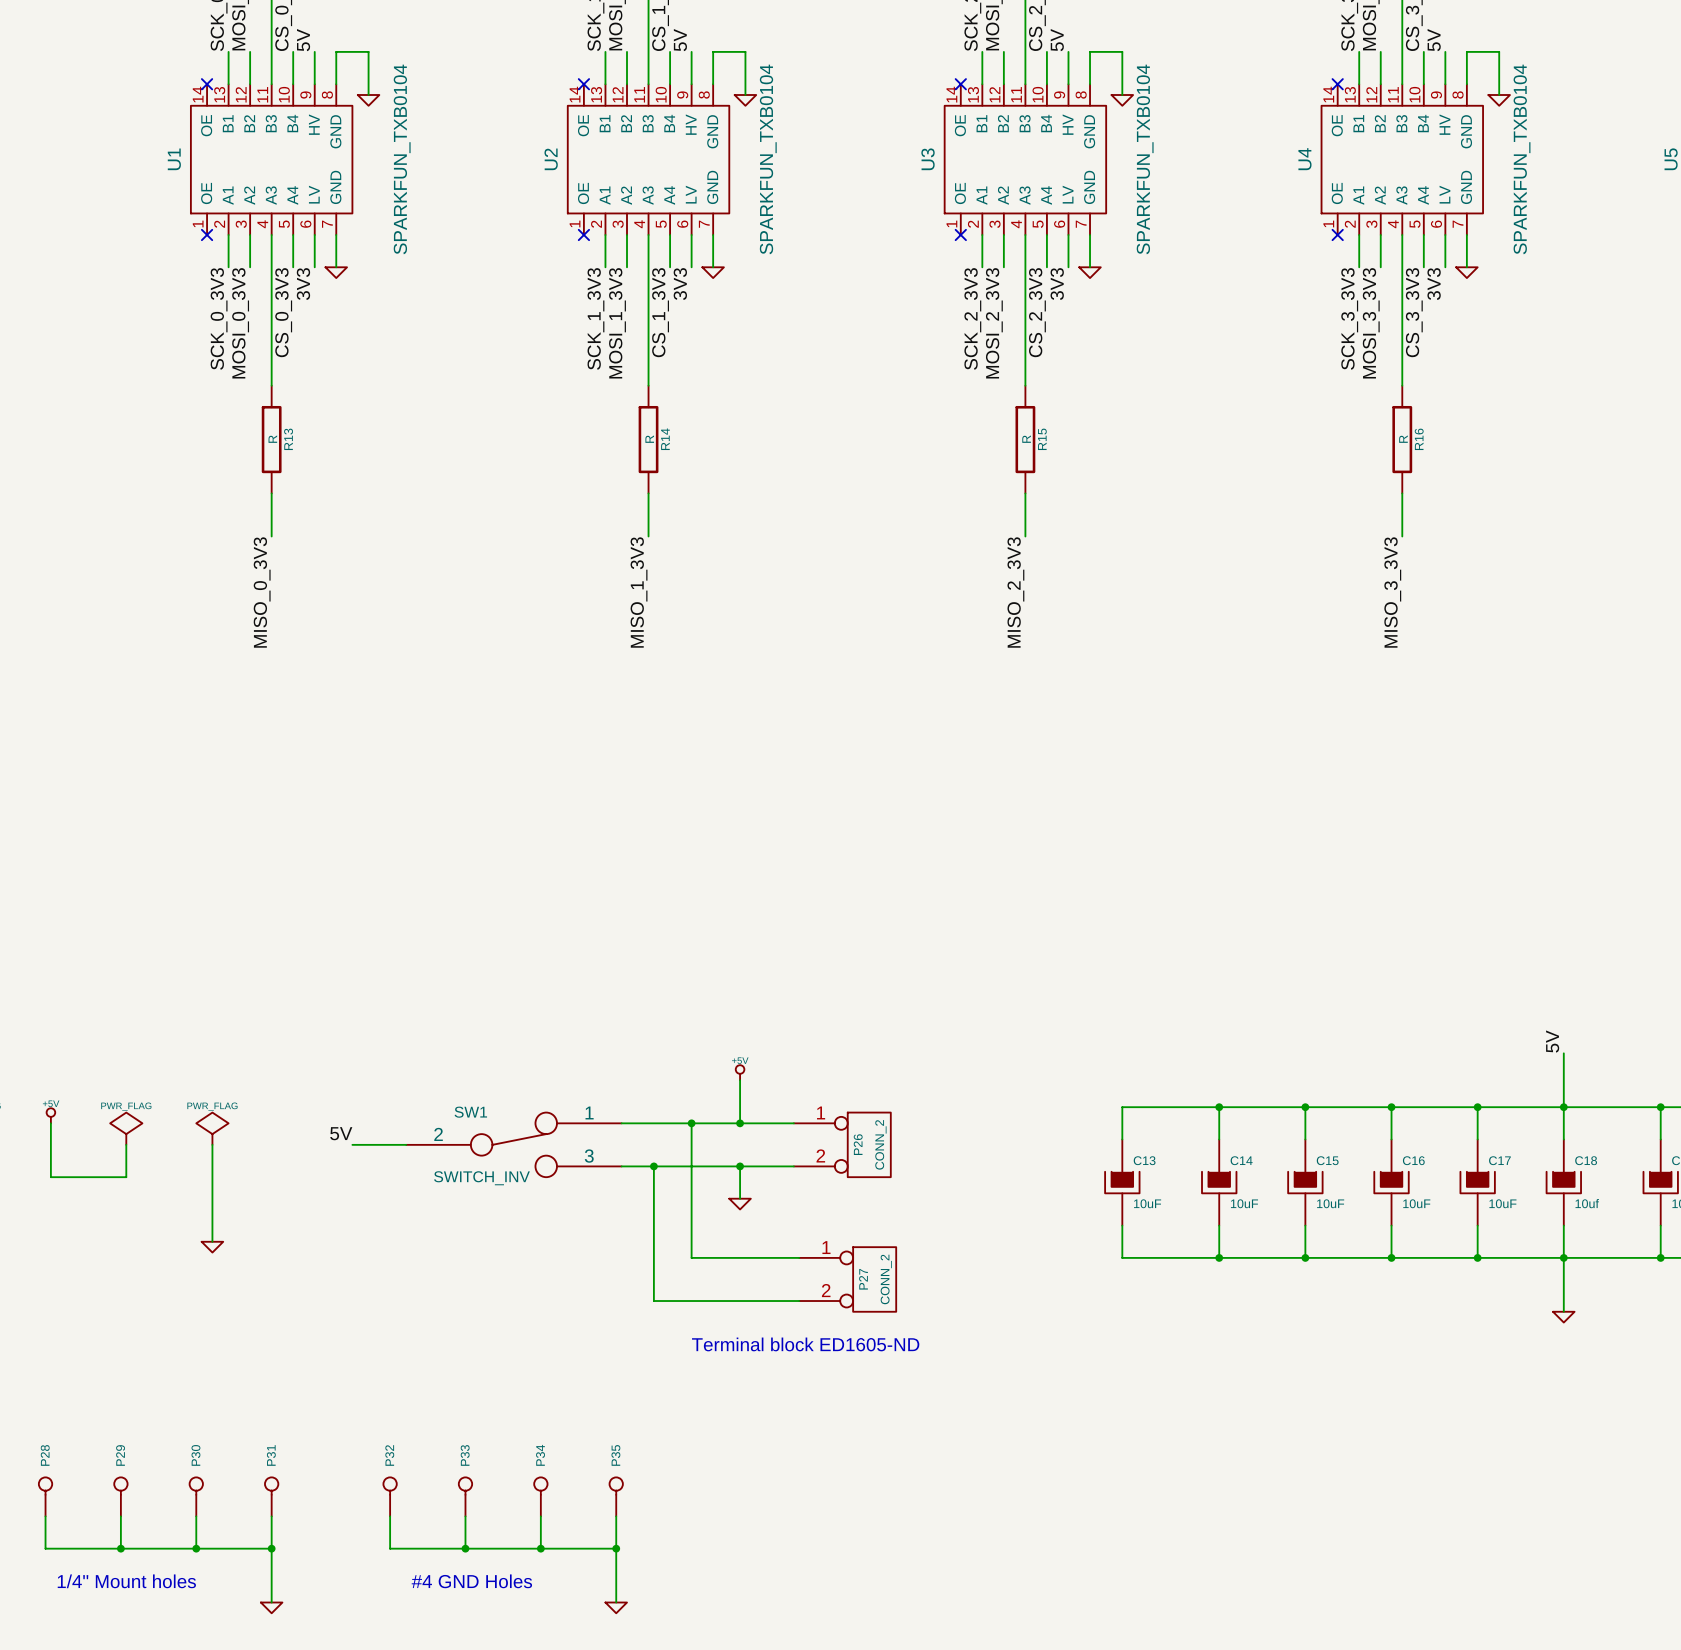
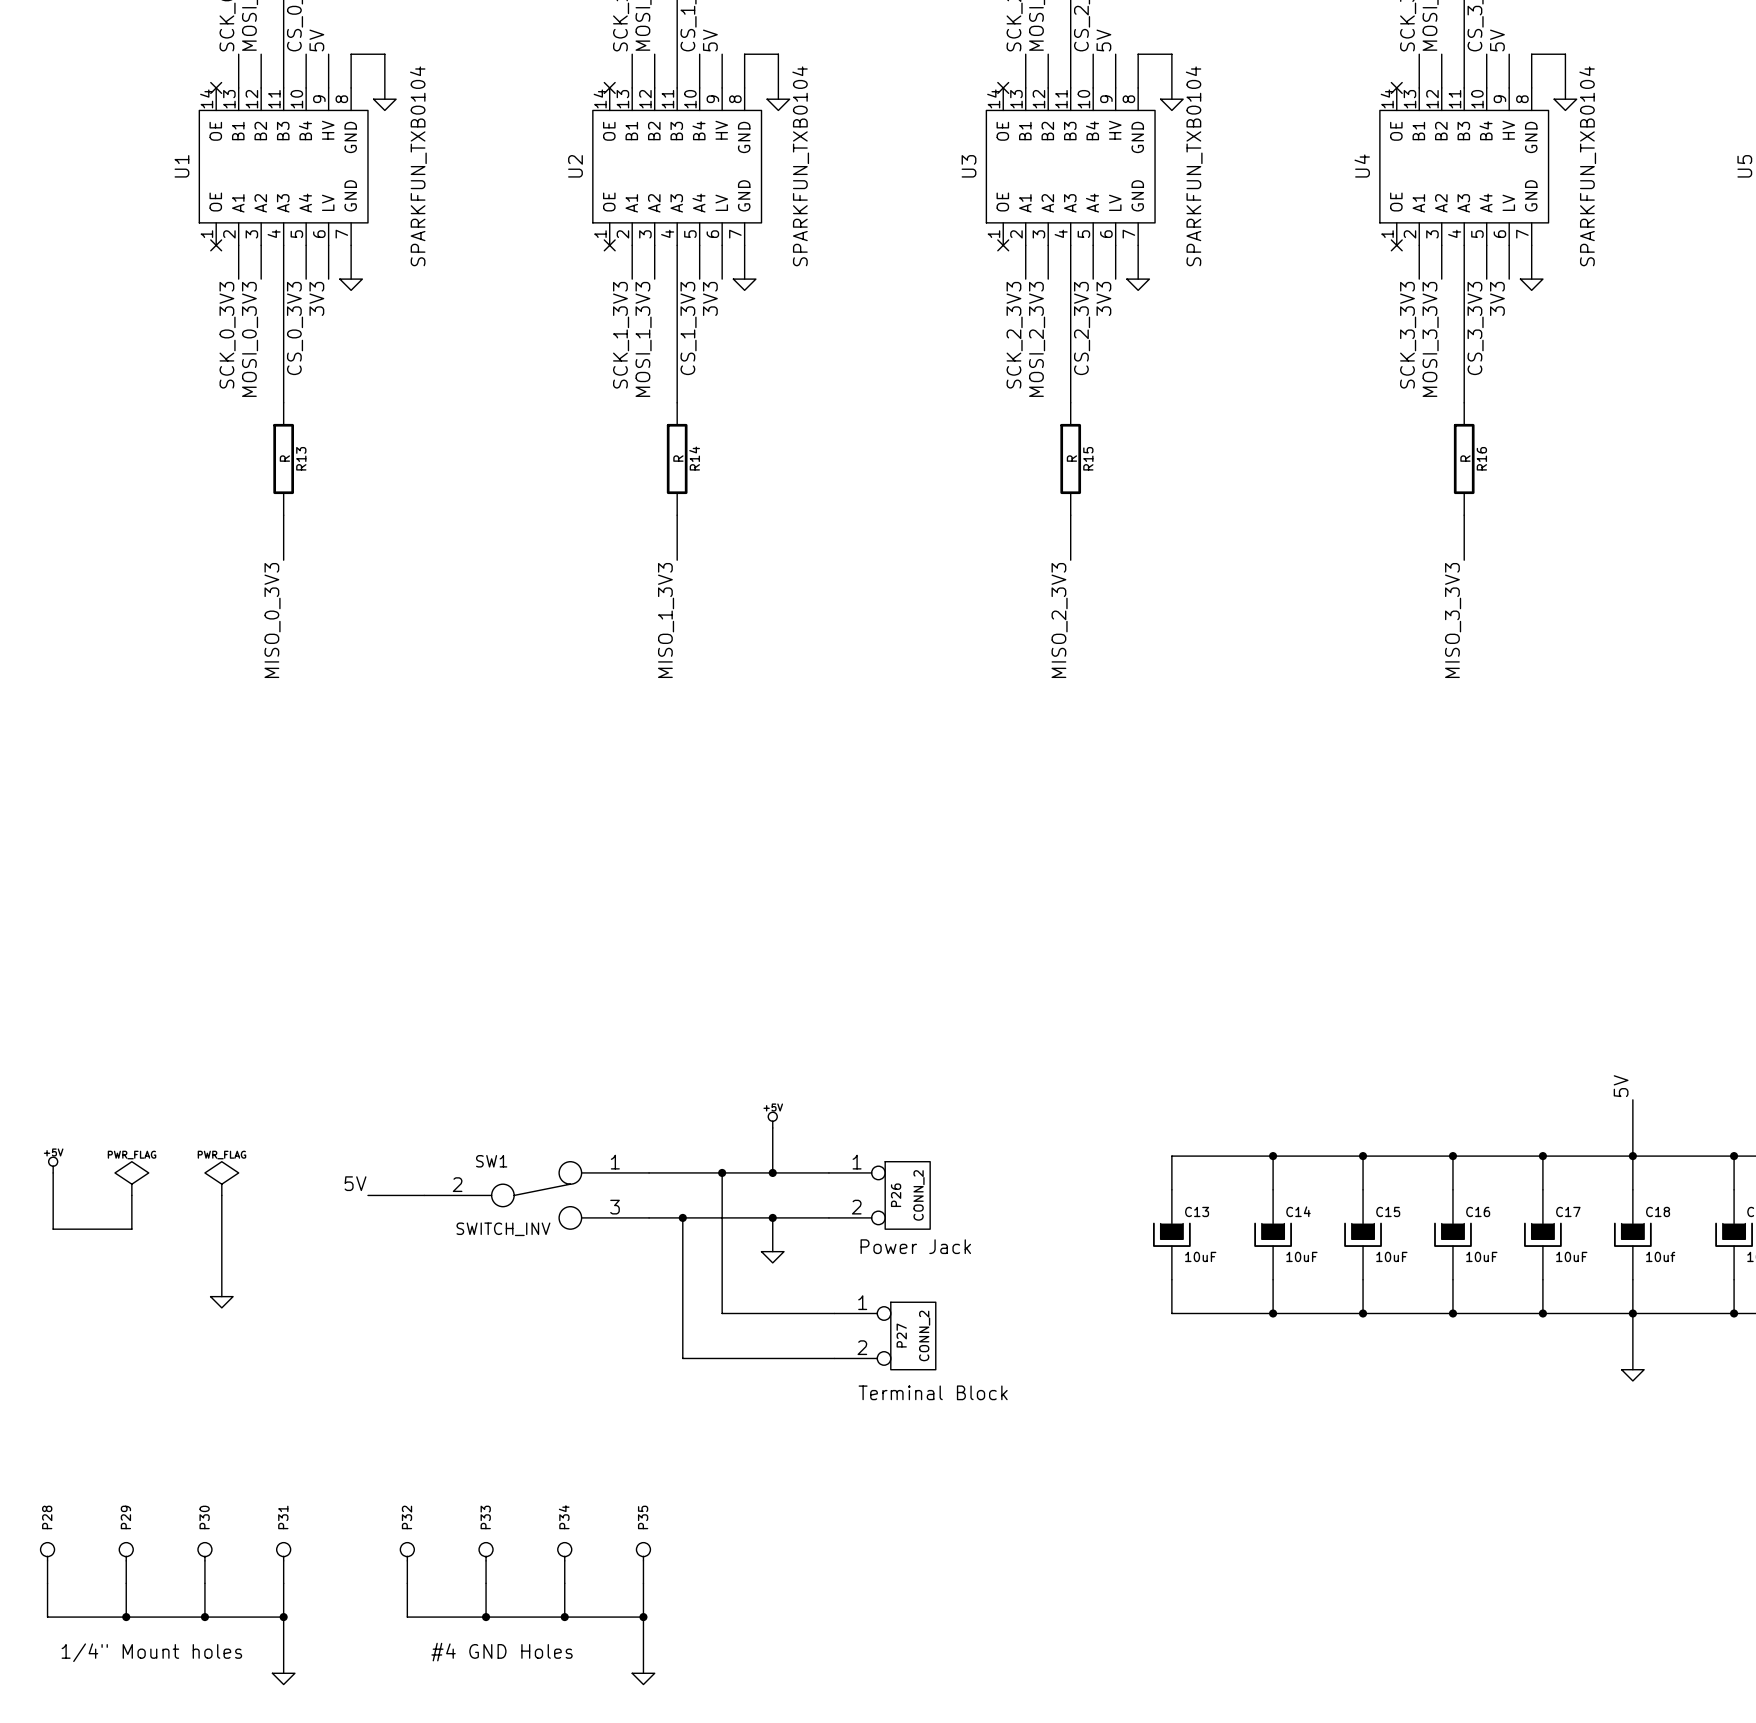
text: none -> Power Jack (915, 1246)
text: Terminal block ED1605-ND (805, 1344) -> Terminal Block (933, 1392)

